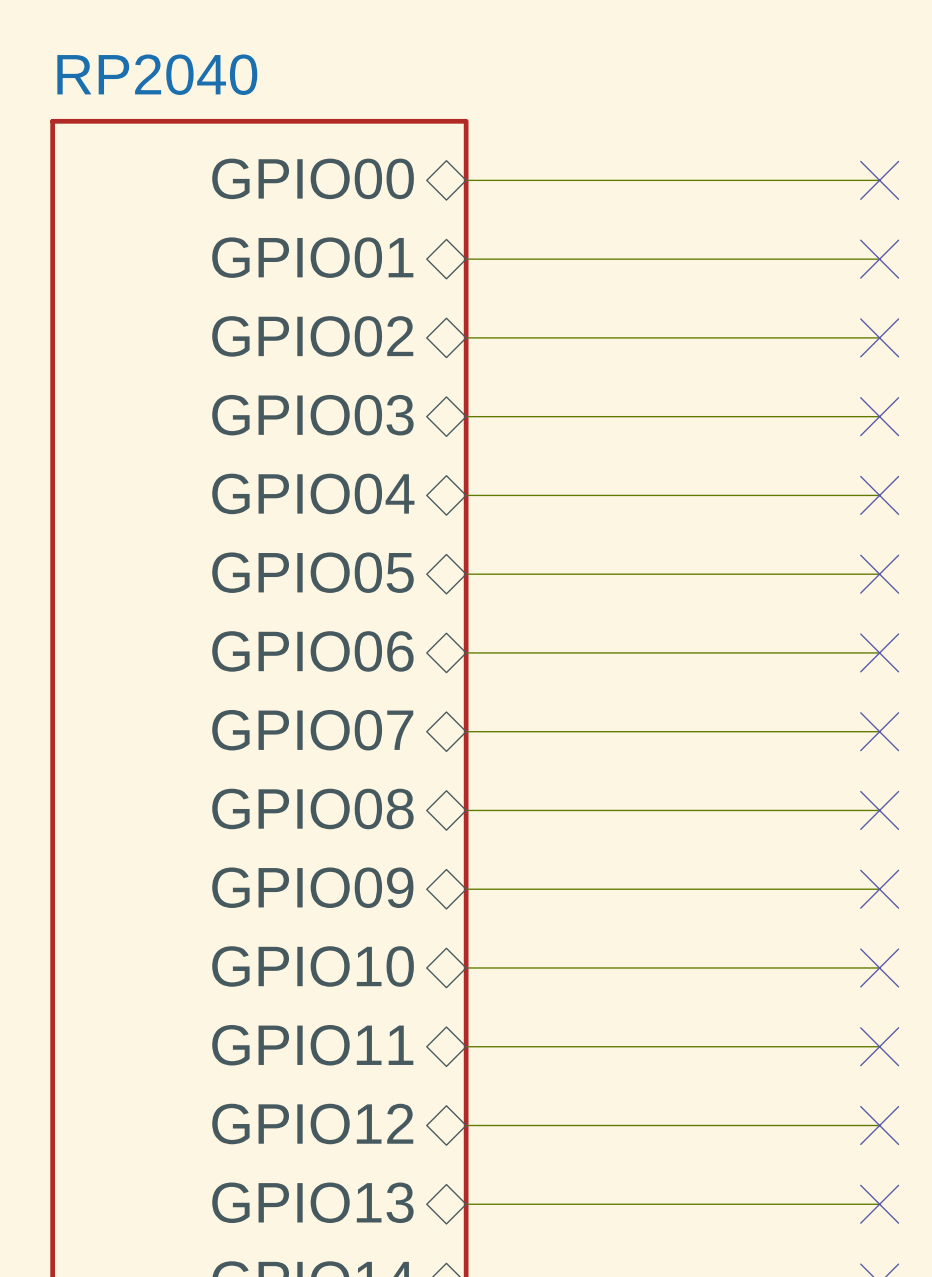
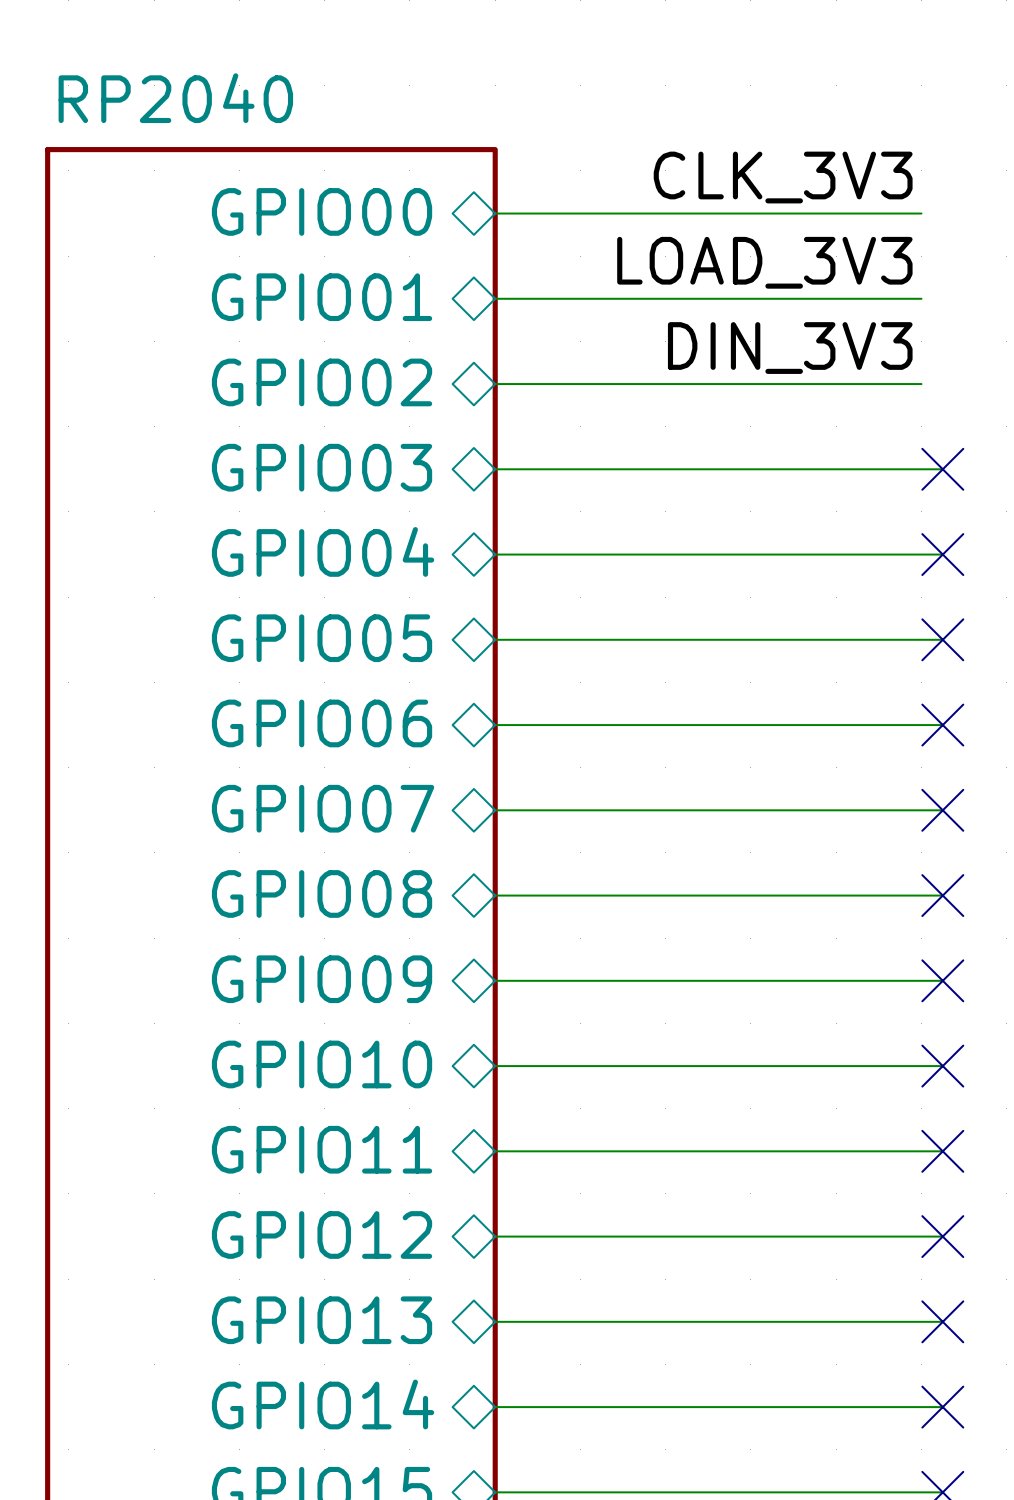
label: none -> CLK_3V3 (783, 177)
wire: (859, 180) (879, 180) -> none
no-connect mark: (879, 180) -> none
label: none -> LOAD_3V3 (764, 262)
wire: (859, 259) (879, 259) -> none
no-connect mark: (879, 259) -> none
label: none -> DIN_3V3 (790, 348)
wire: (859, 337) (879, 337) -> none
no-connect mark: (879, 337) -> none

